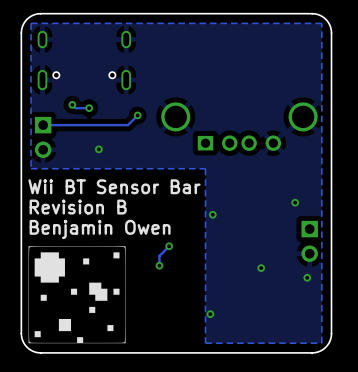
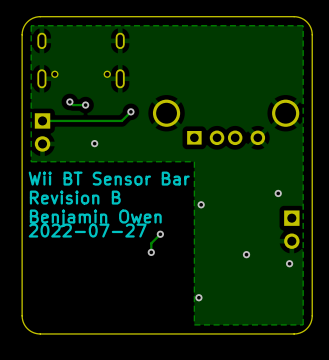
text: none -> 2022-07-27 (87, 230)
drawing: [28, 246, 126, 344] -> none

